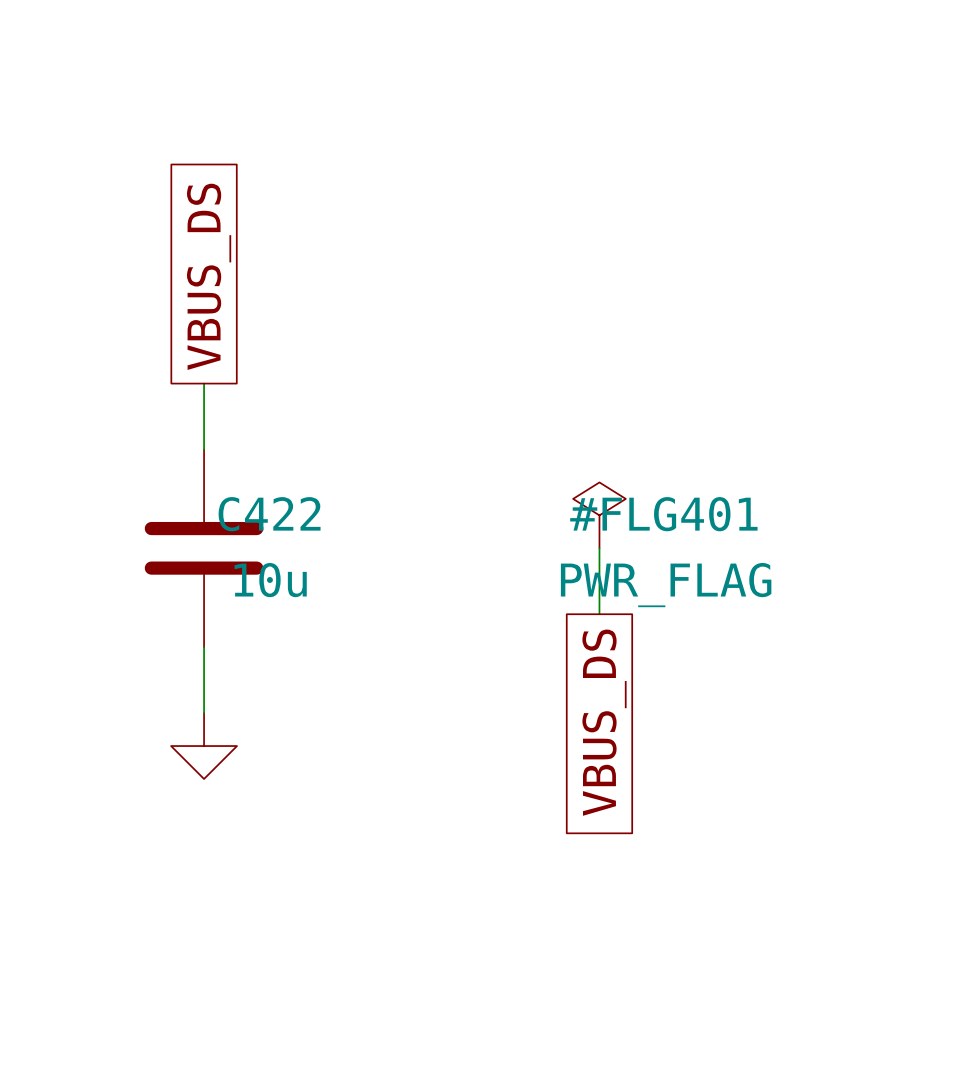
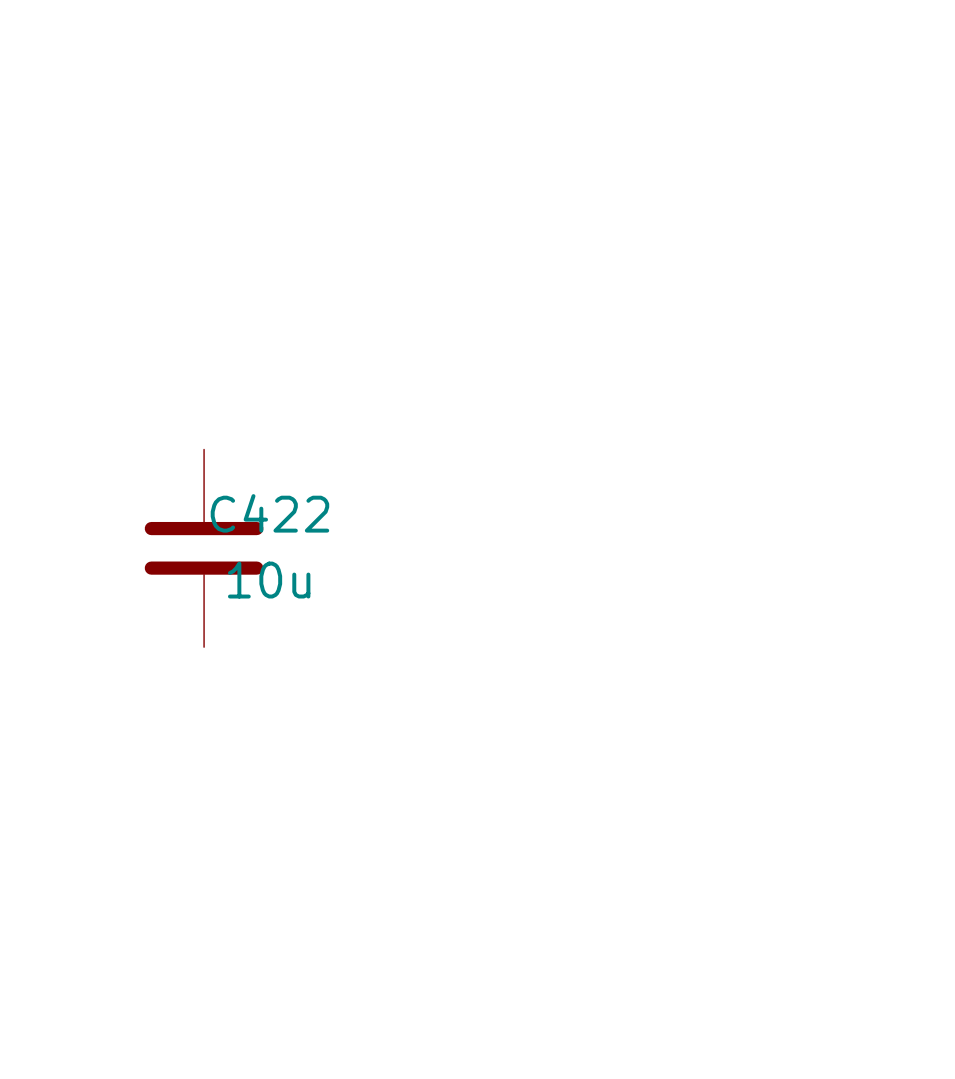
global label: VBUS_DS (209, 276) -> none
wire: (204, 383) (204, 449) -> none
#FLG401: PWR_FLAG (599, 515) -> none
wire: (599, 548) (599, 614) -> none
wire: (204, 647) (204, 713) -> none
global label: VBUS_DS (604, 722) -> none
power symbol: (204, 746) -> none

